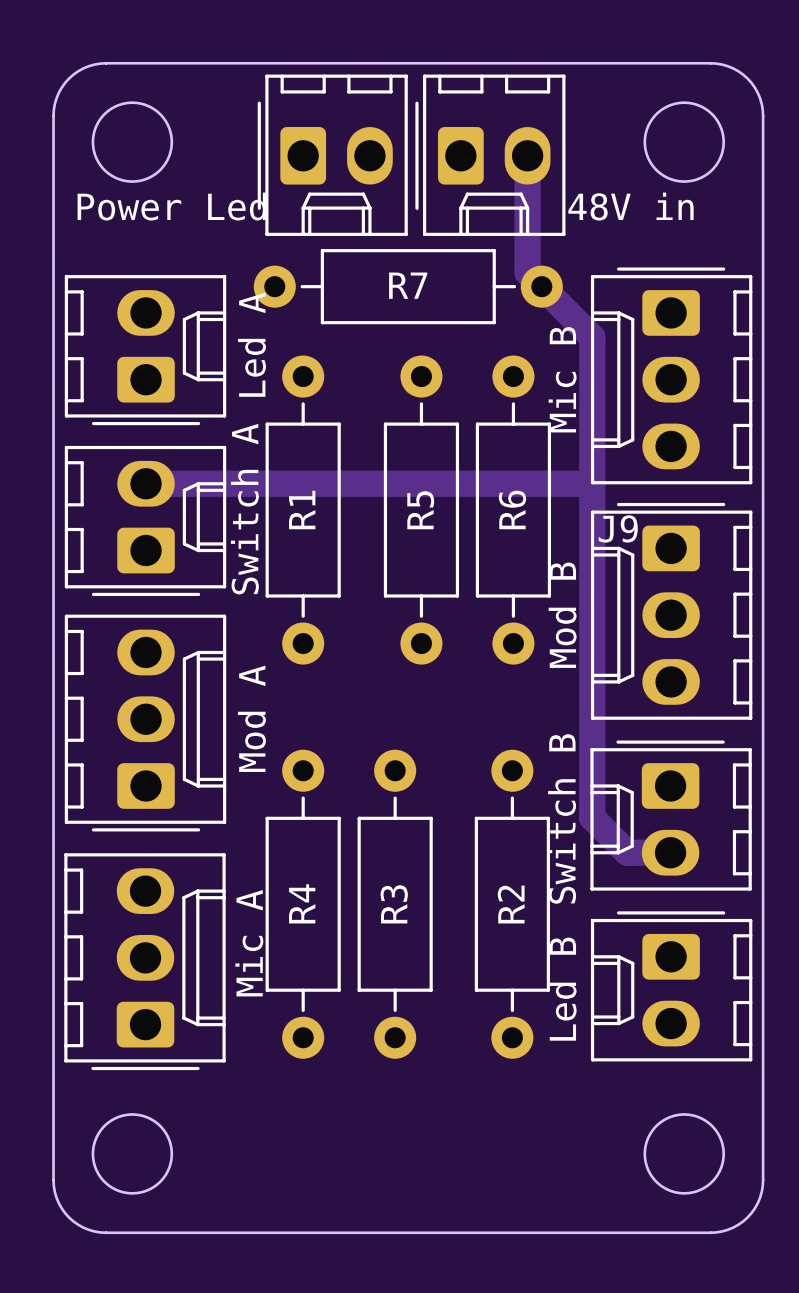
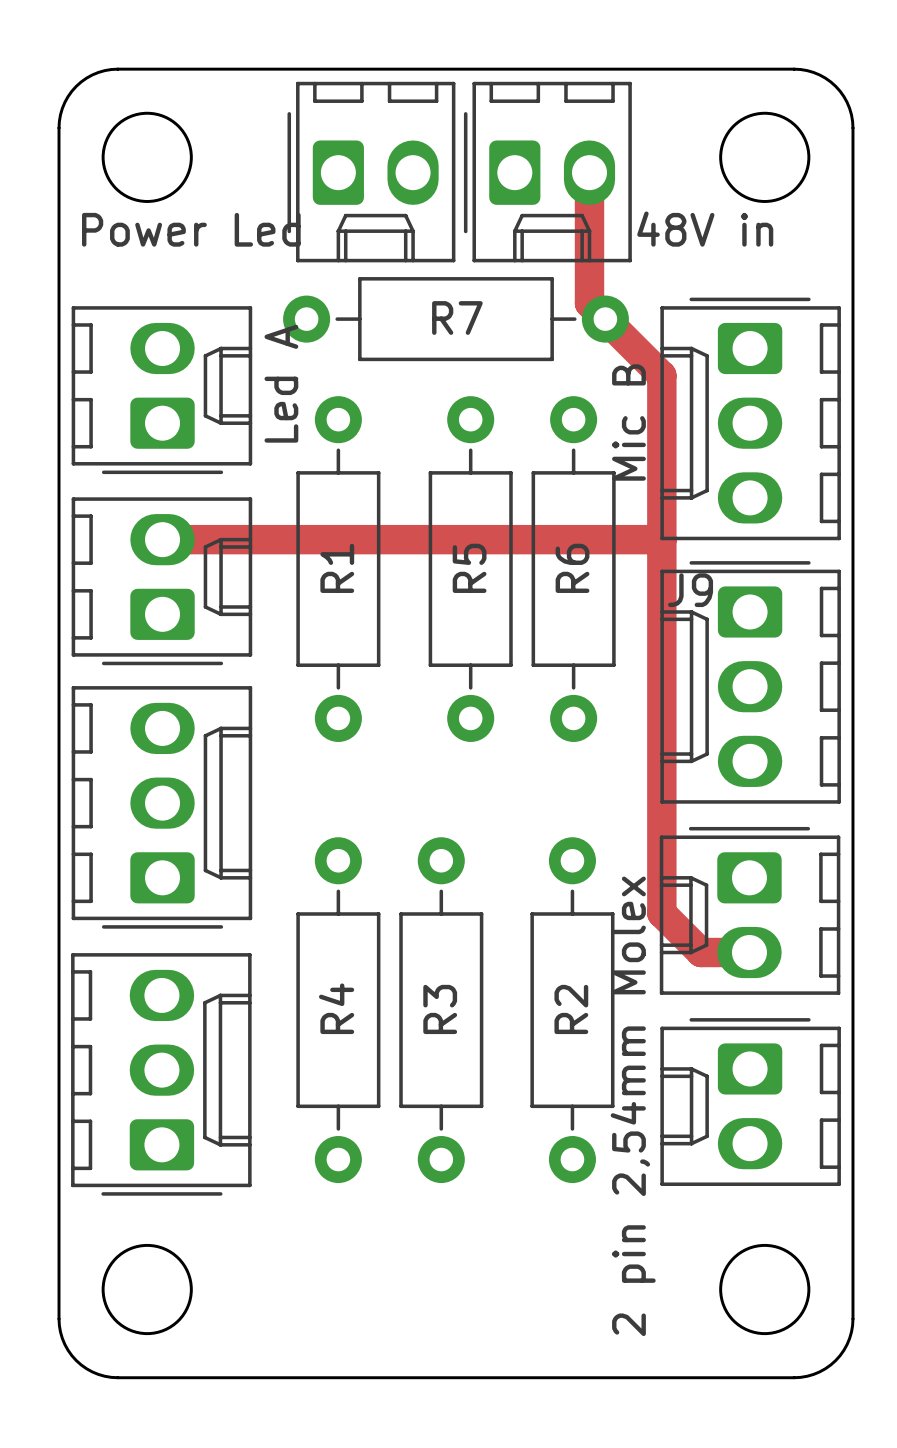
part value: Switch A (244, 509) -> none
J9 value: Mod B (562, 615) -> none
part value: Mod A (251, 718) -> none
part value: Switch B (562, 818) -> none
part value: Mic A (249, 943) -> none
part value: Led B (562, 989) -> 2 pin 2,54mm Molex (633, 1106)

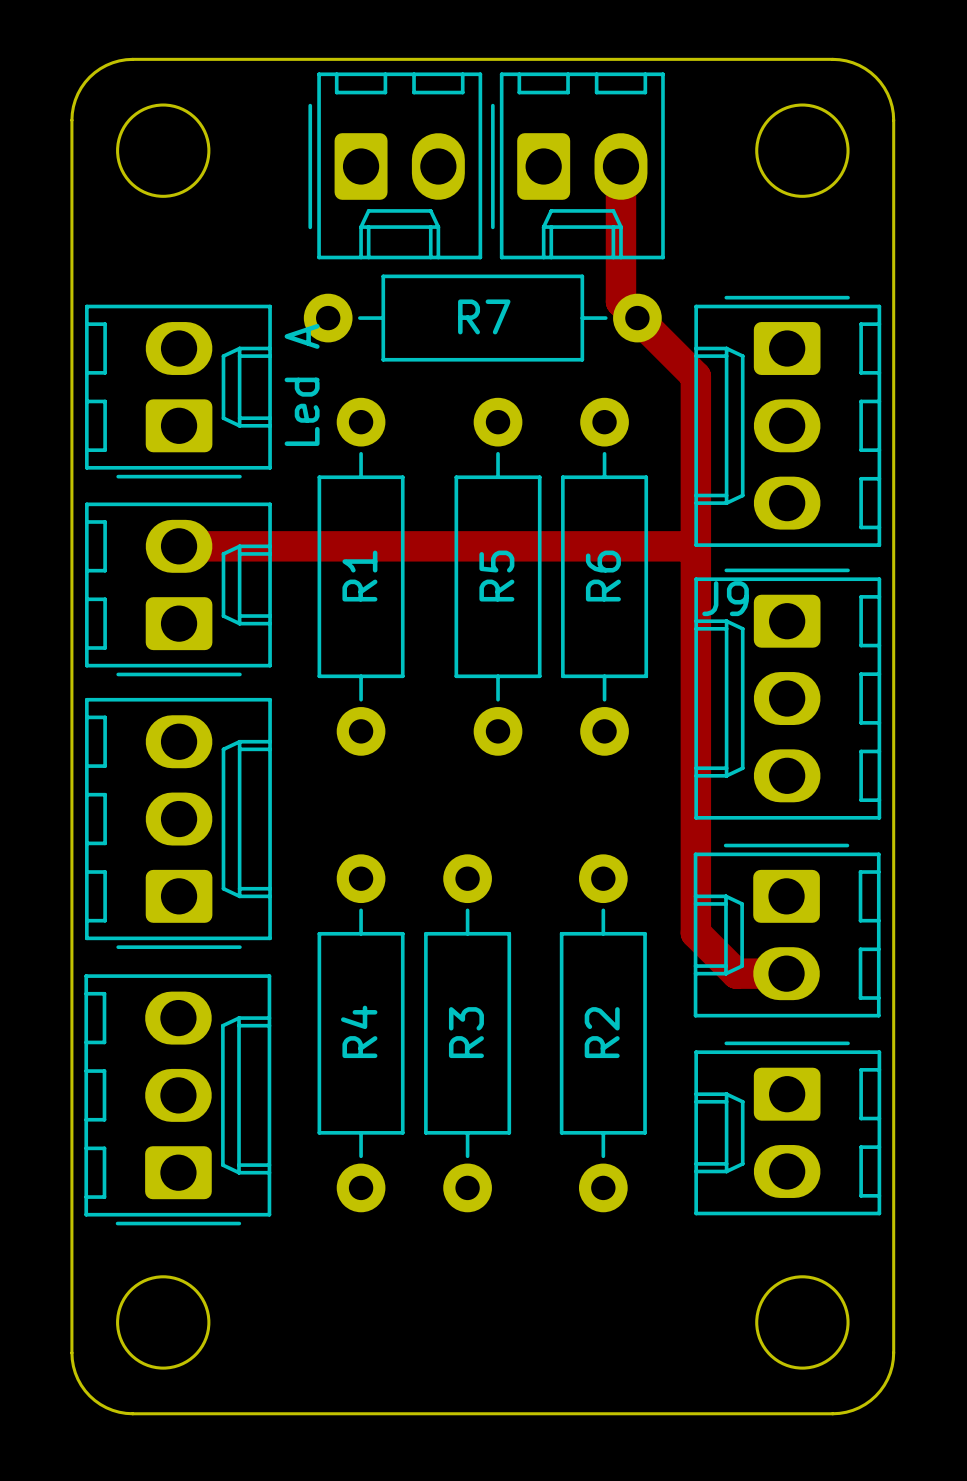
part value: Power Led (191, 229) -> none
part value: 48V in (705, 229) -> none
part value: Mic B (628, 422) -> none
part value: 2 pin 2,54mm Molex (633, 1106) -> none

